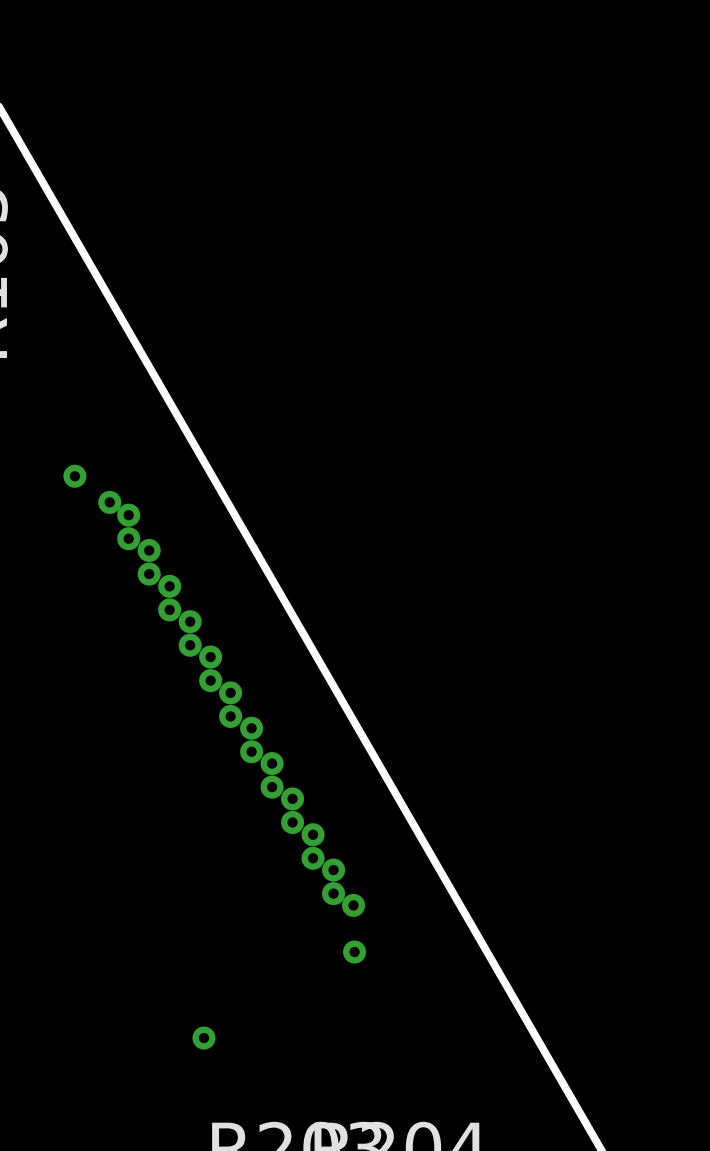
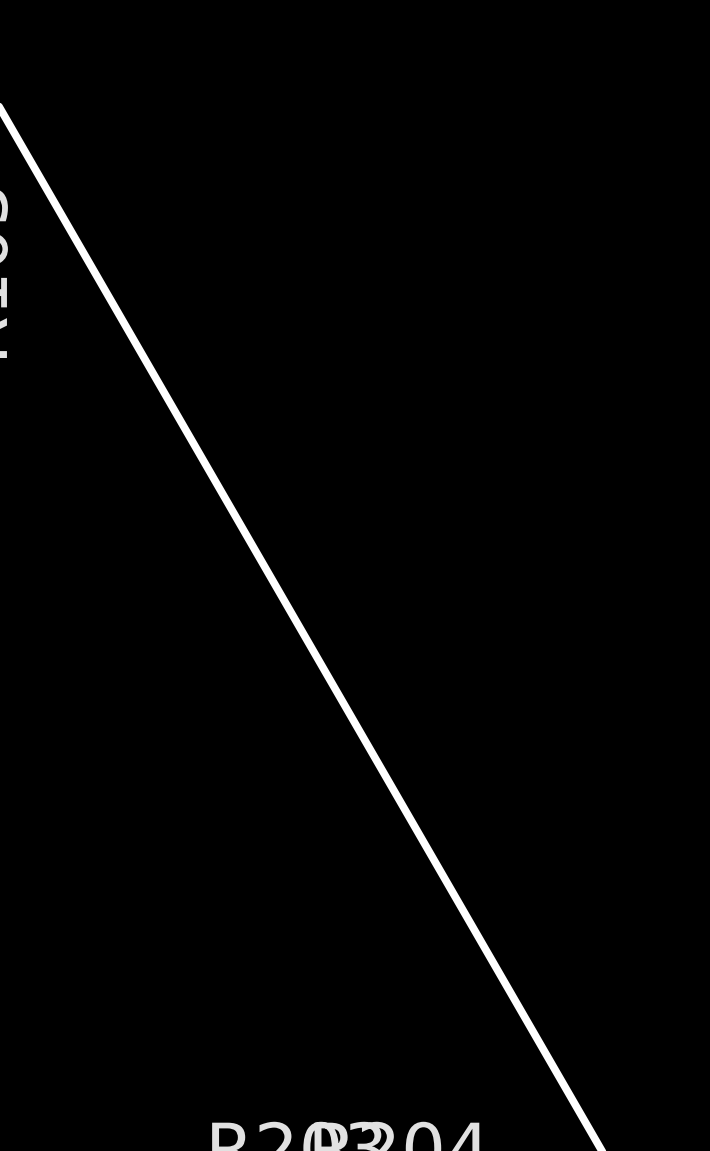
via: (74, 476) -> none
via: (109, 502) -> none
via: (128, 515) -> none
via: (128, 538) -> none
via: (149, 550) -> none
via: (149, 574) -> none
via: (169, 586) -> none
via: (169, 609) -> none
via: (190, 621) -> none
via: (190, 645) -> none
via: (210, 657) -> none
via: (210, 680) -> none
via: (230, 692) -> none
via: (230, 716) -> none
via: (251, 728) -> none
via: (251, 751) -> none
via: (272, 763) -> none
via: (272, 787) -> none
via: (292, 798) -> none
via: (292, 822) -> none
via: (313, 834) -> none
via: (313, 858) -> none
via: (333, 870) -> none
via: (333, 893) -> none
via: (353, 905) -> none
via: (354, 952) -> none
via: (203, 1038) -> none

